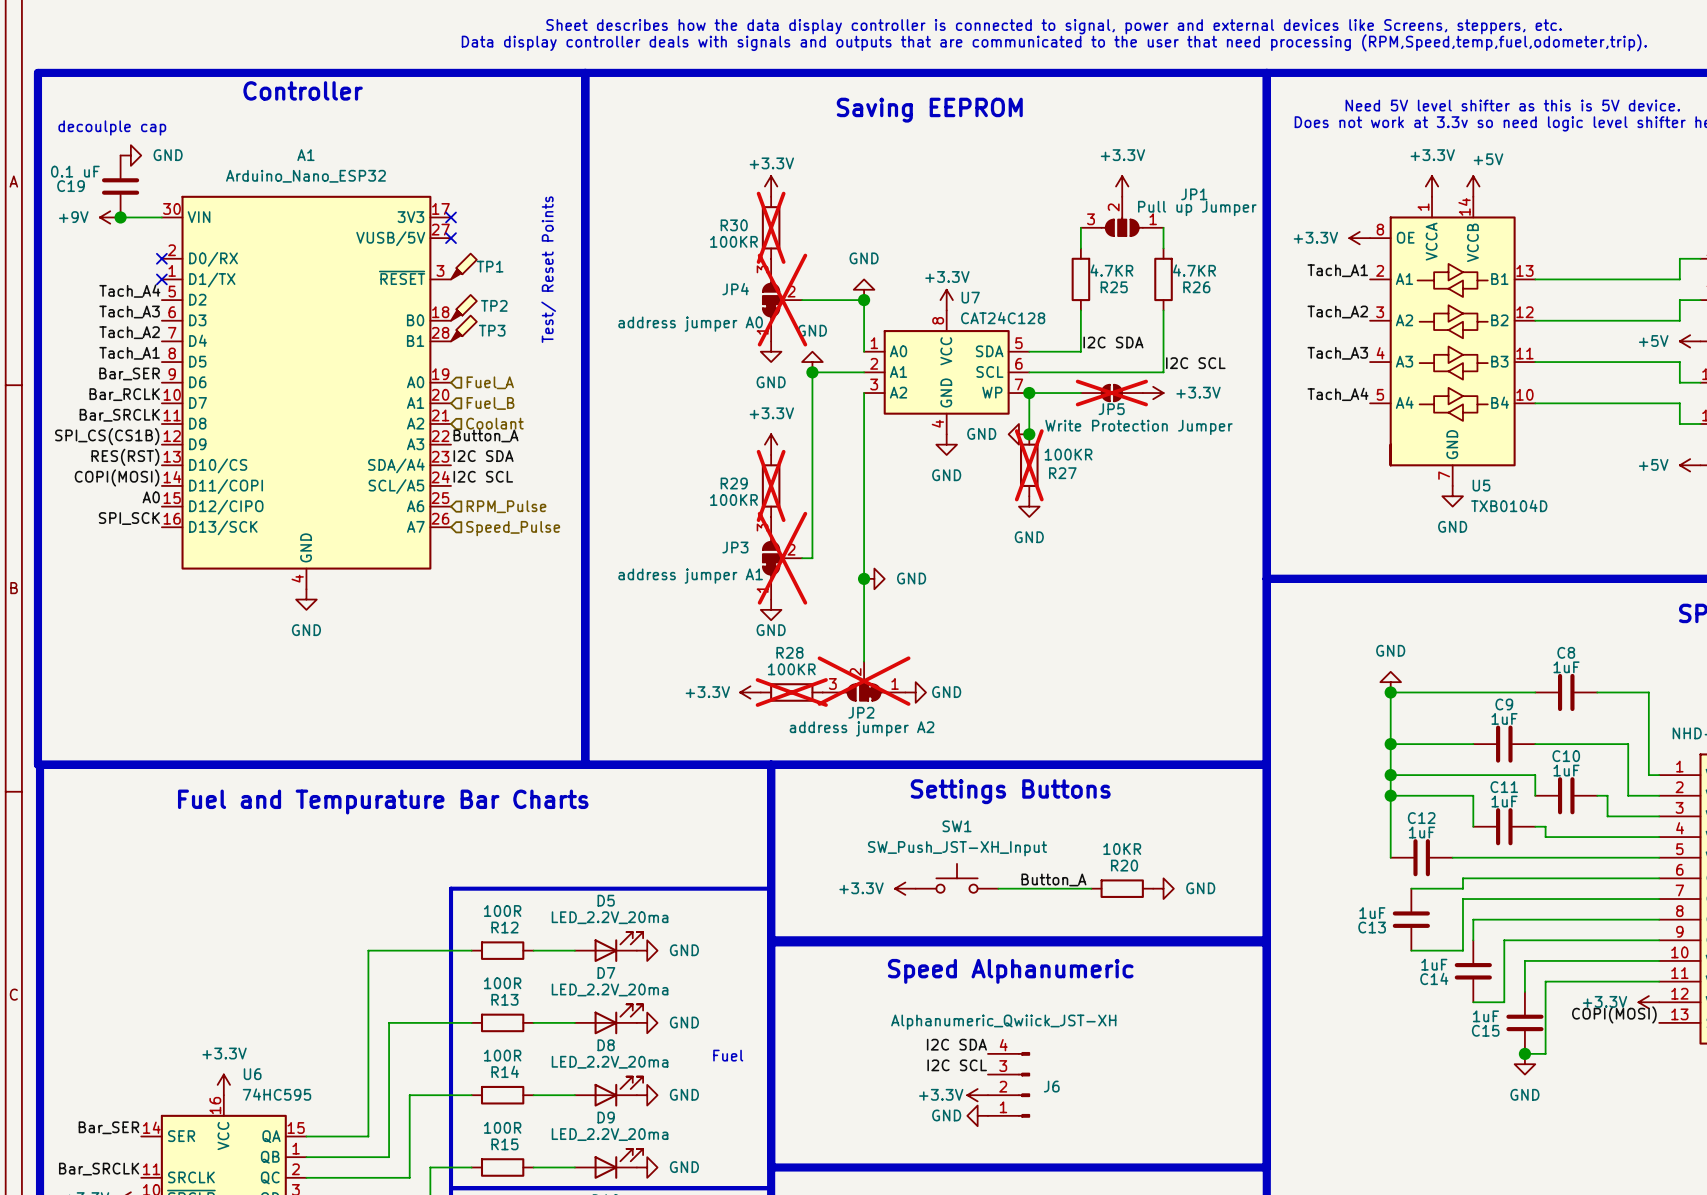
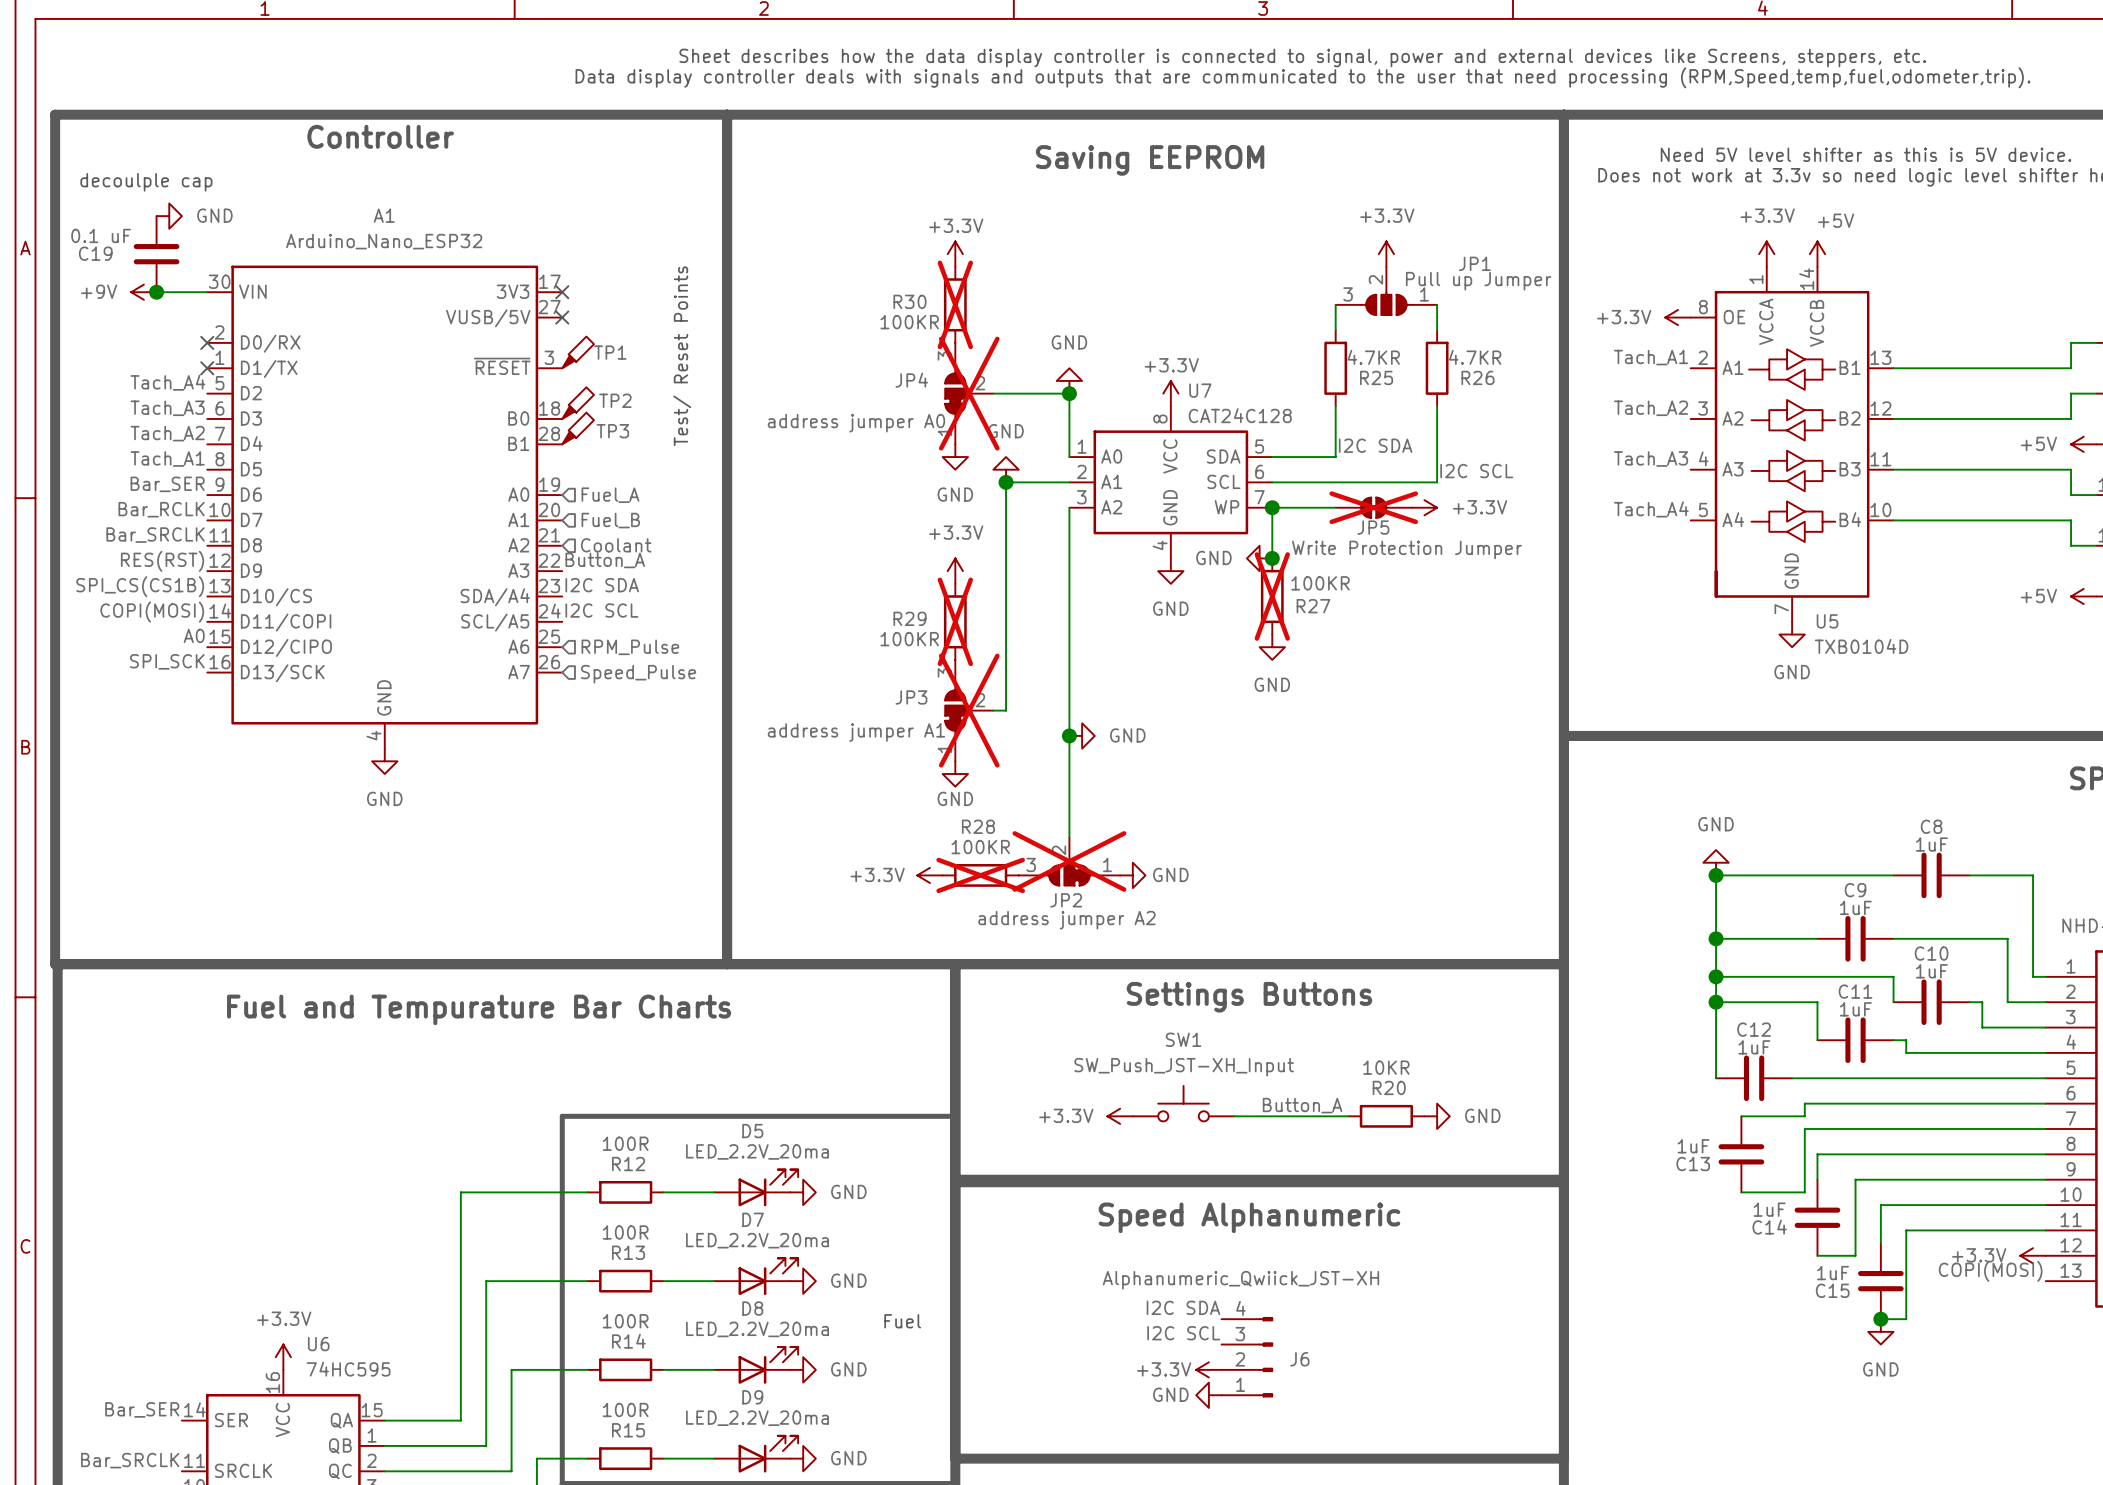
label: SPI_CS(CS1B) (107, 436) -> RES(RST) (162, 561)
label: RES(RST) (125, 457) -> SPI_CS(CS1B) (140, 586)

